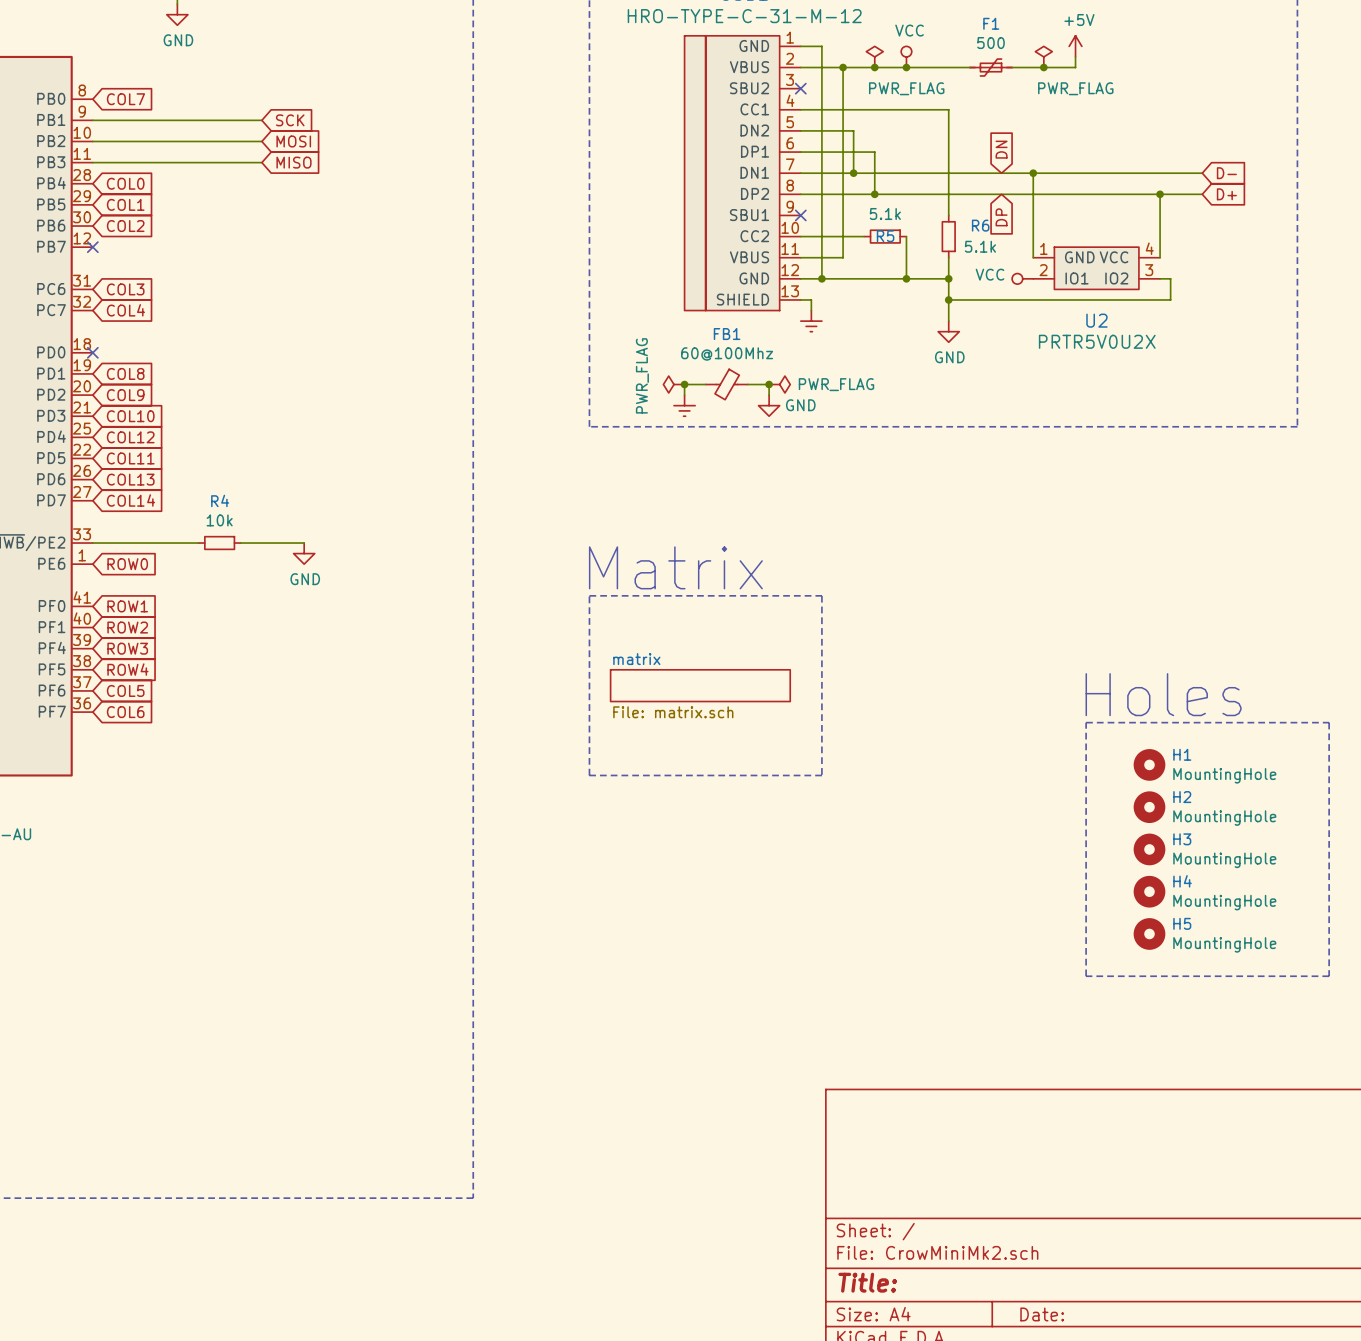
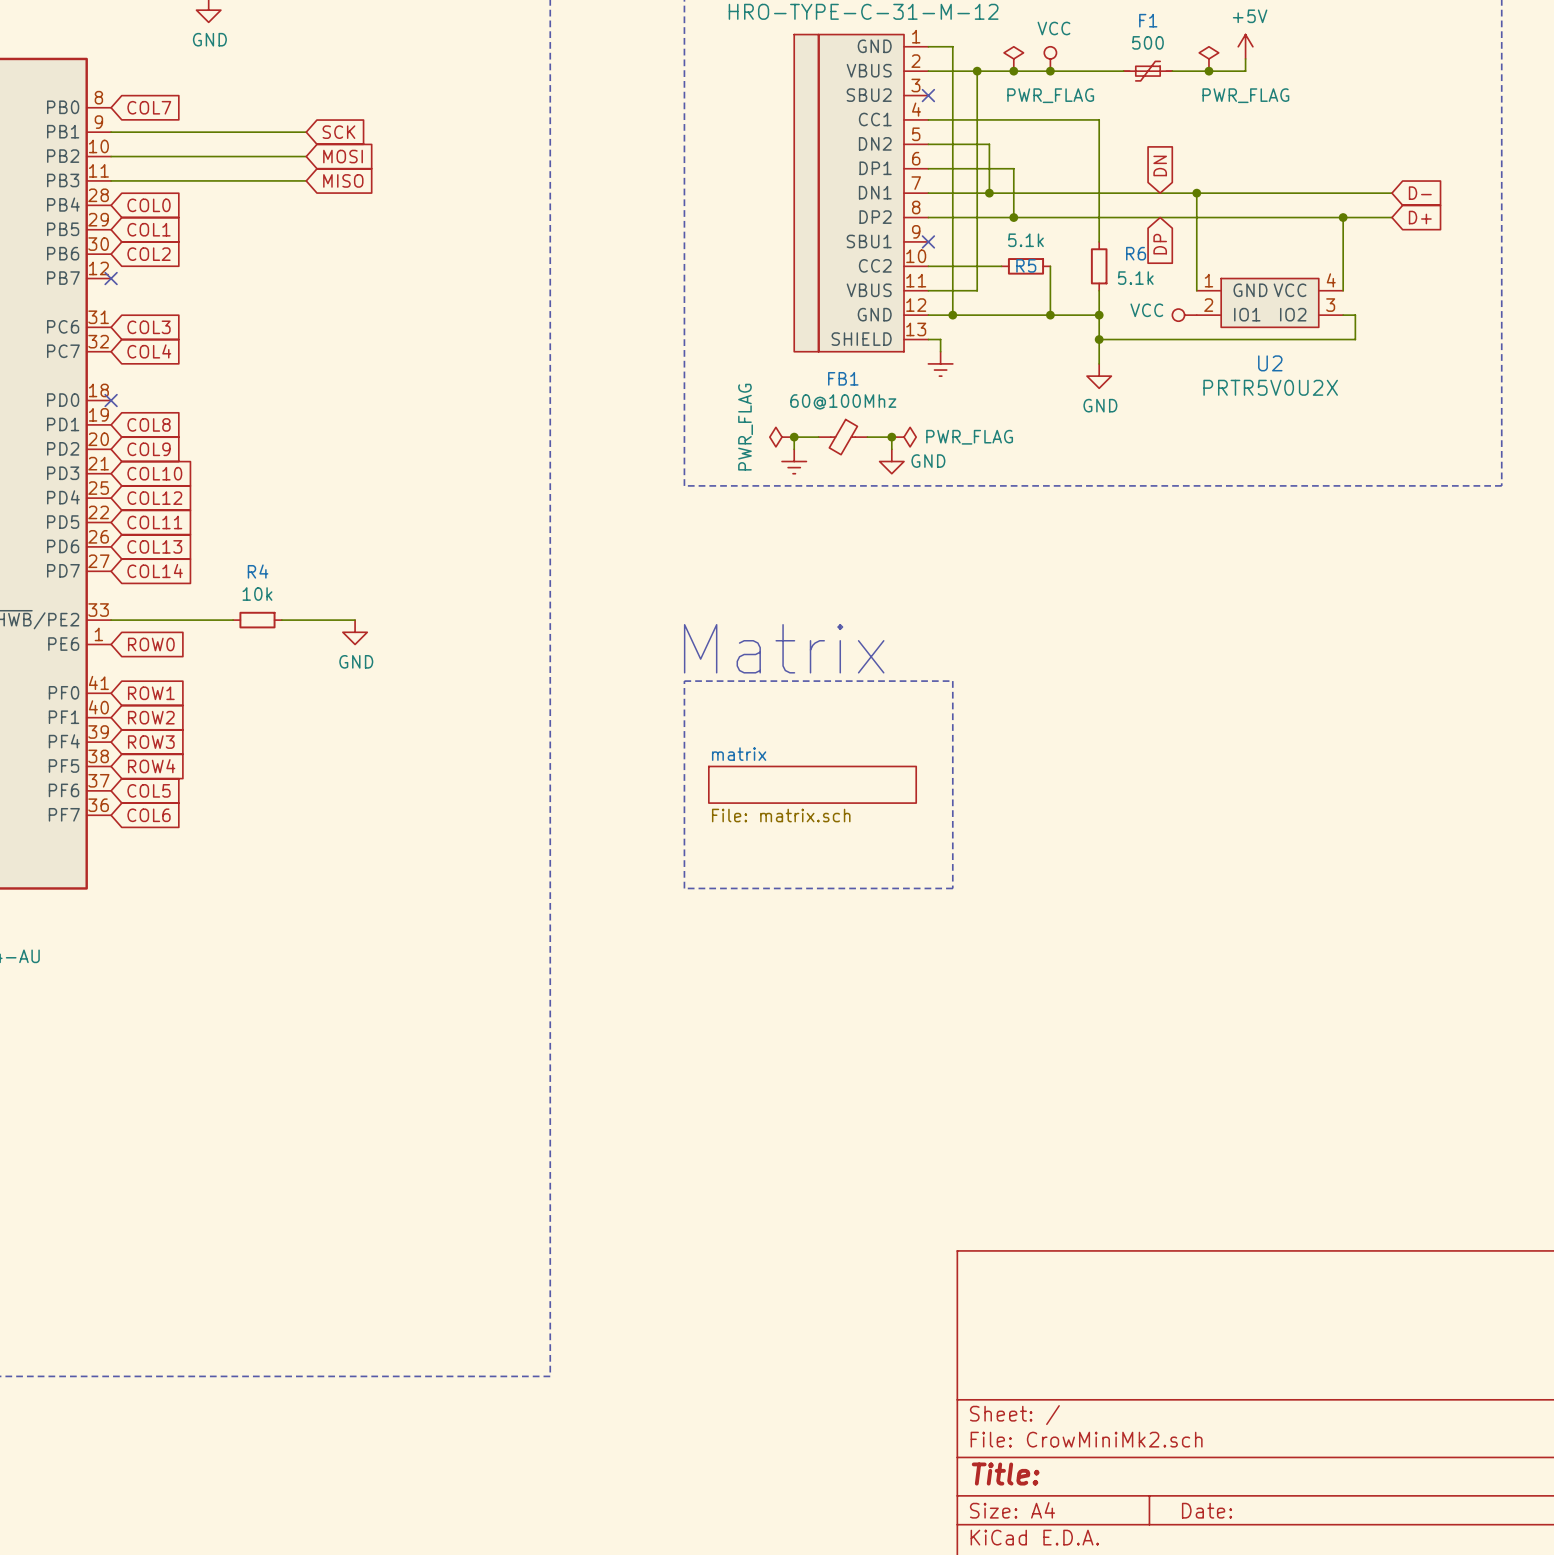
text: Holes (1163, 694) -> none
line: (1086, 722) (1086, 976) (1329, 976) (1329, 722) (1086, 722) -> none
H1: MountingHole (1149, 764) -> none
H2: MountingHole (1149, 807) -> none
H3: MountingHole (1149, 849) -> none
H4: MountingHole (1149, 891) -> none
H5: MountingHole (1149, 933) -> none

